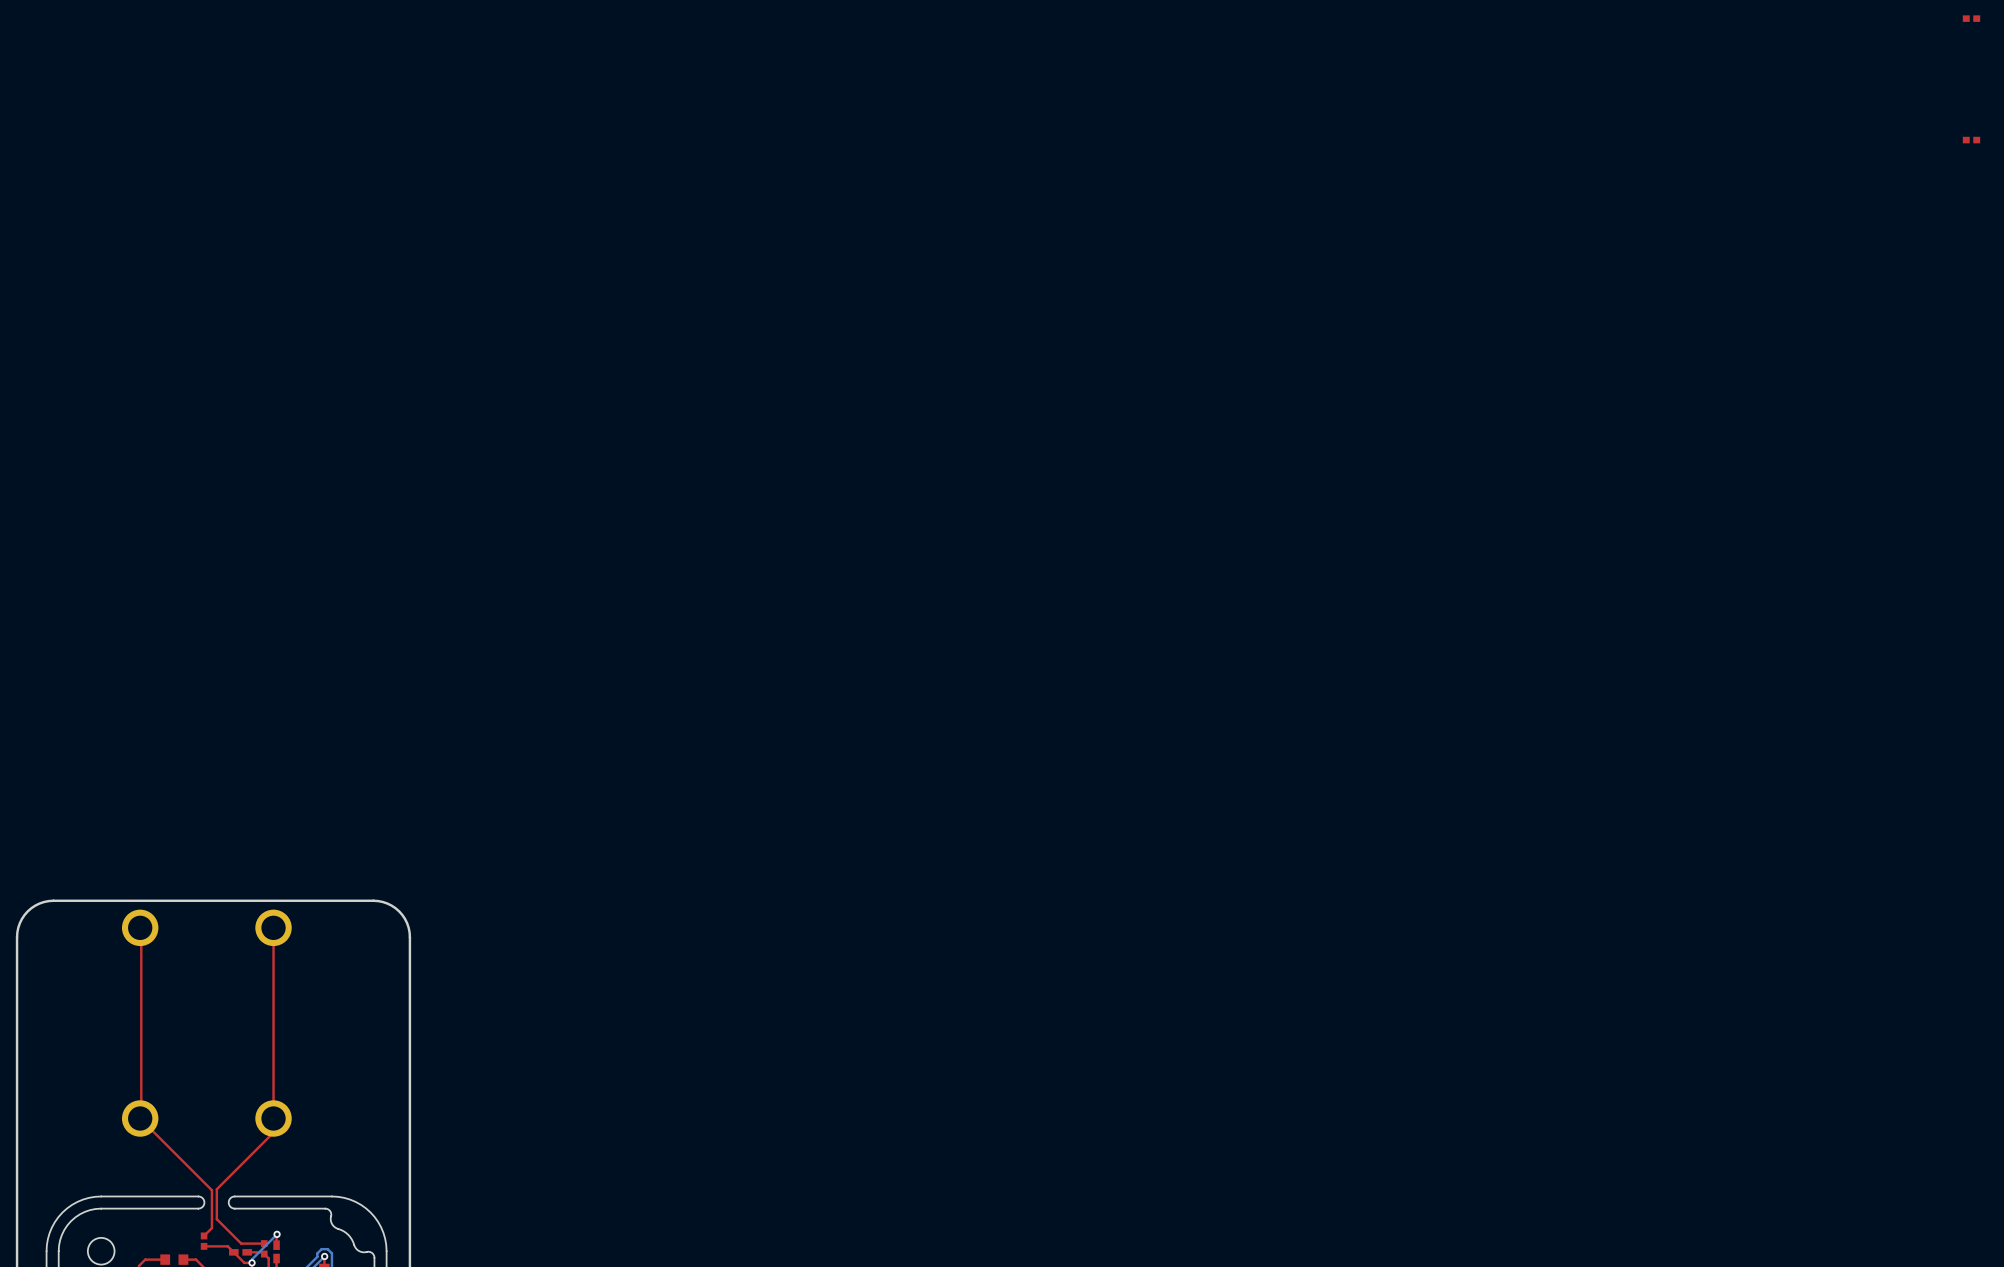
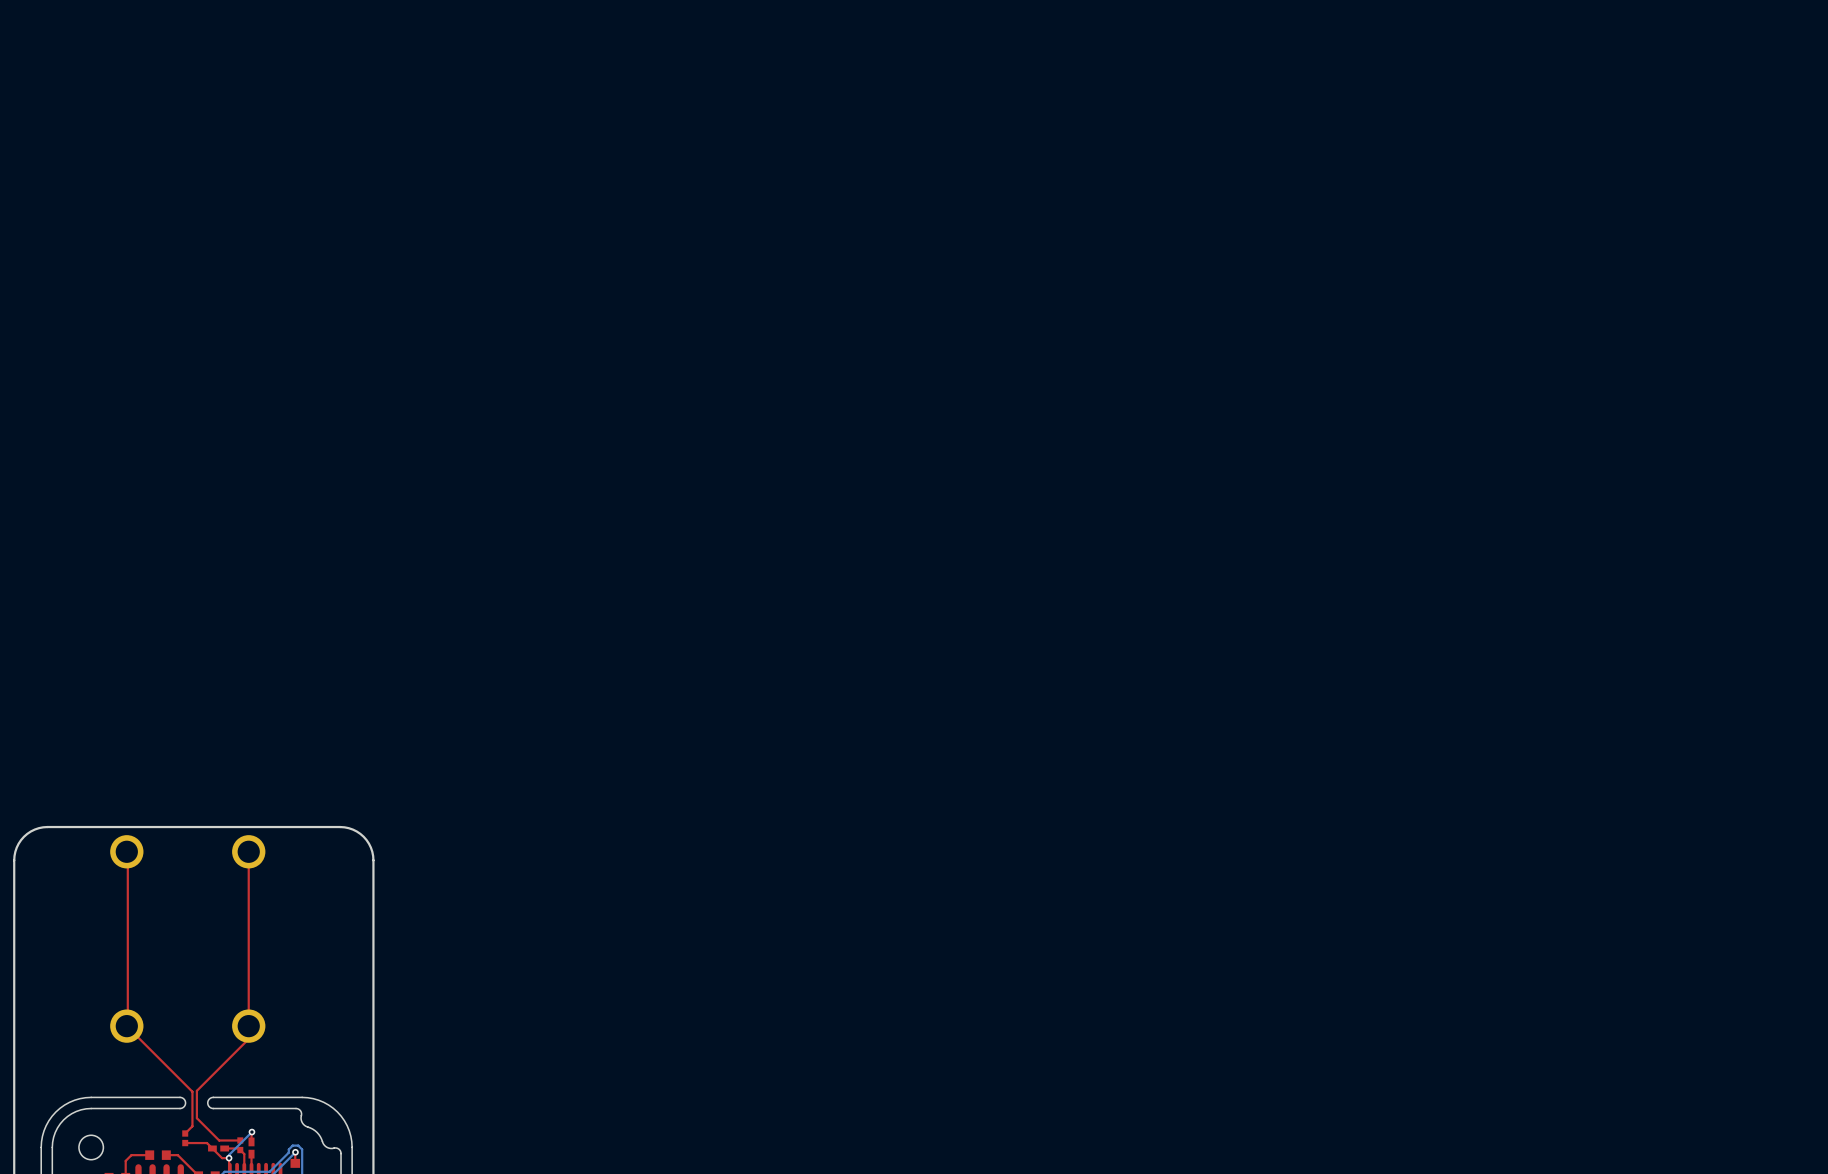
part: (1971, 18) -> none
part: (1971, 140) -> none

